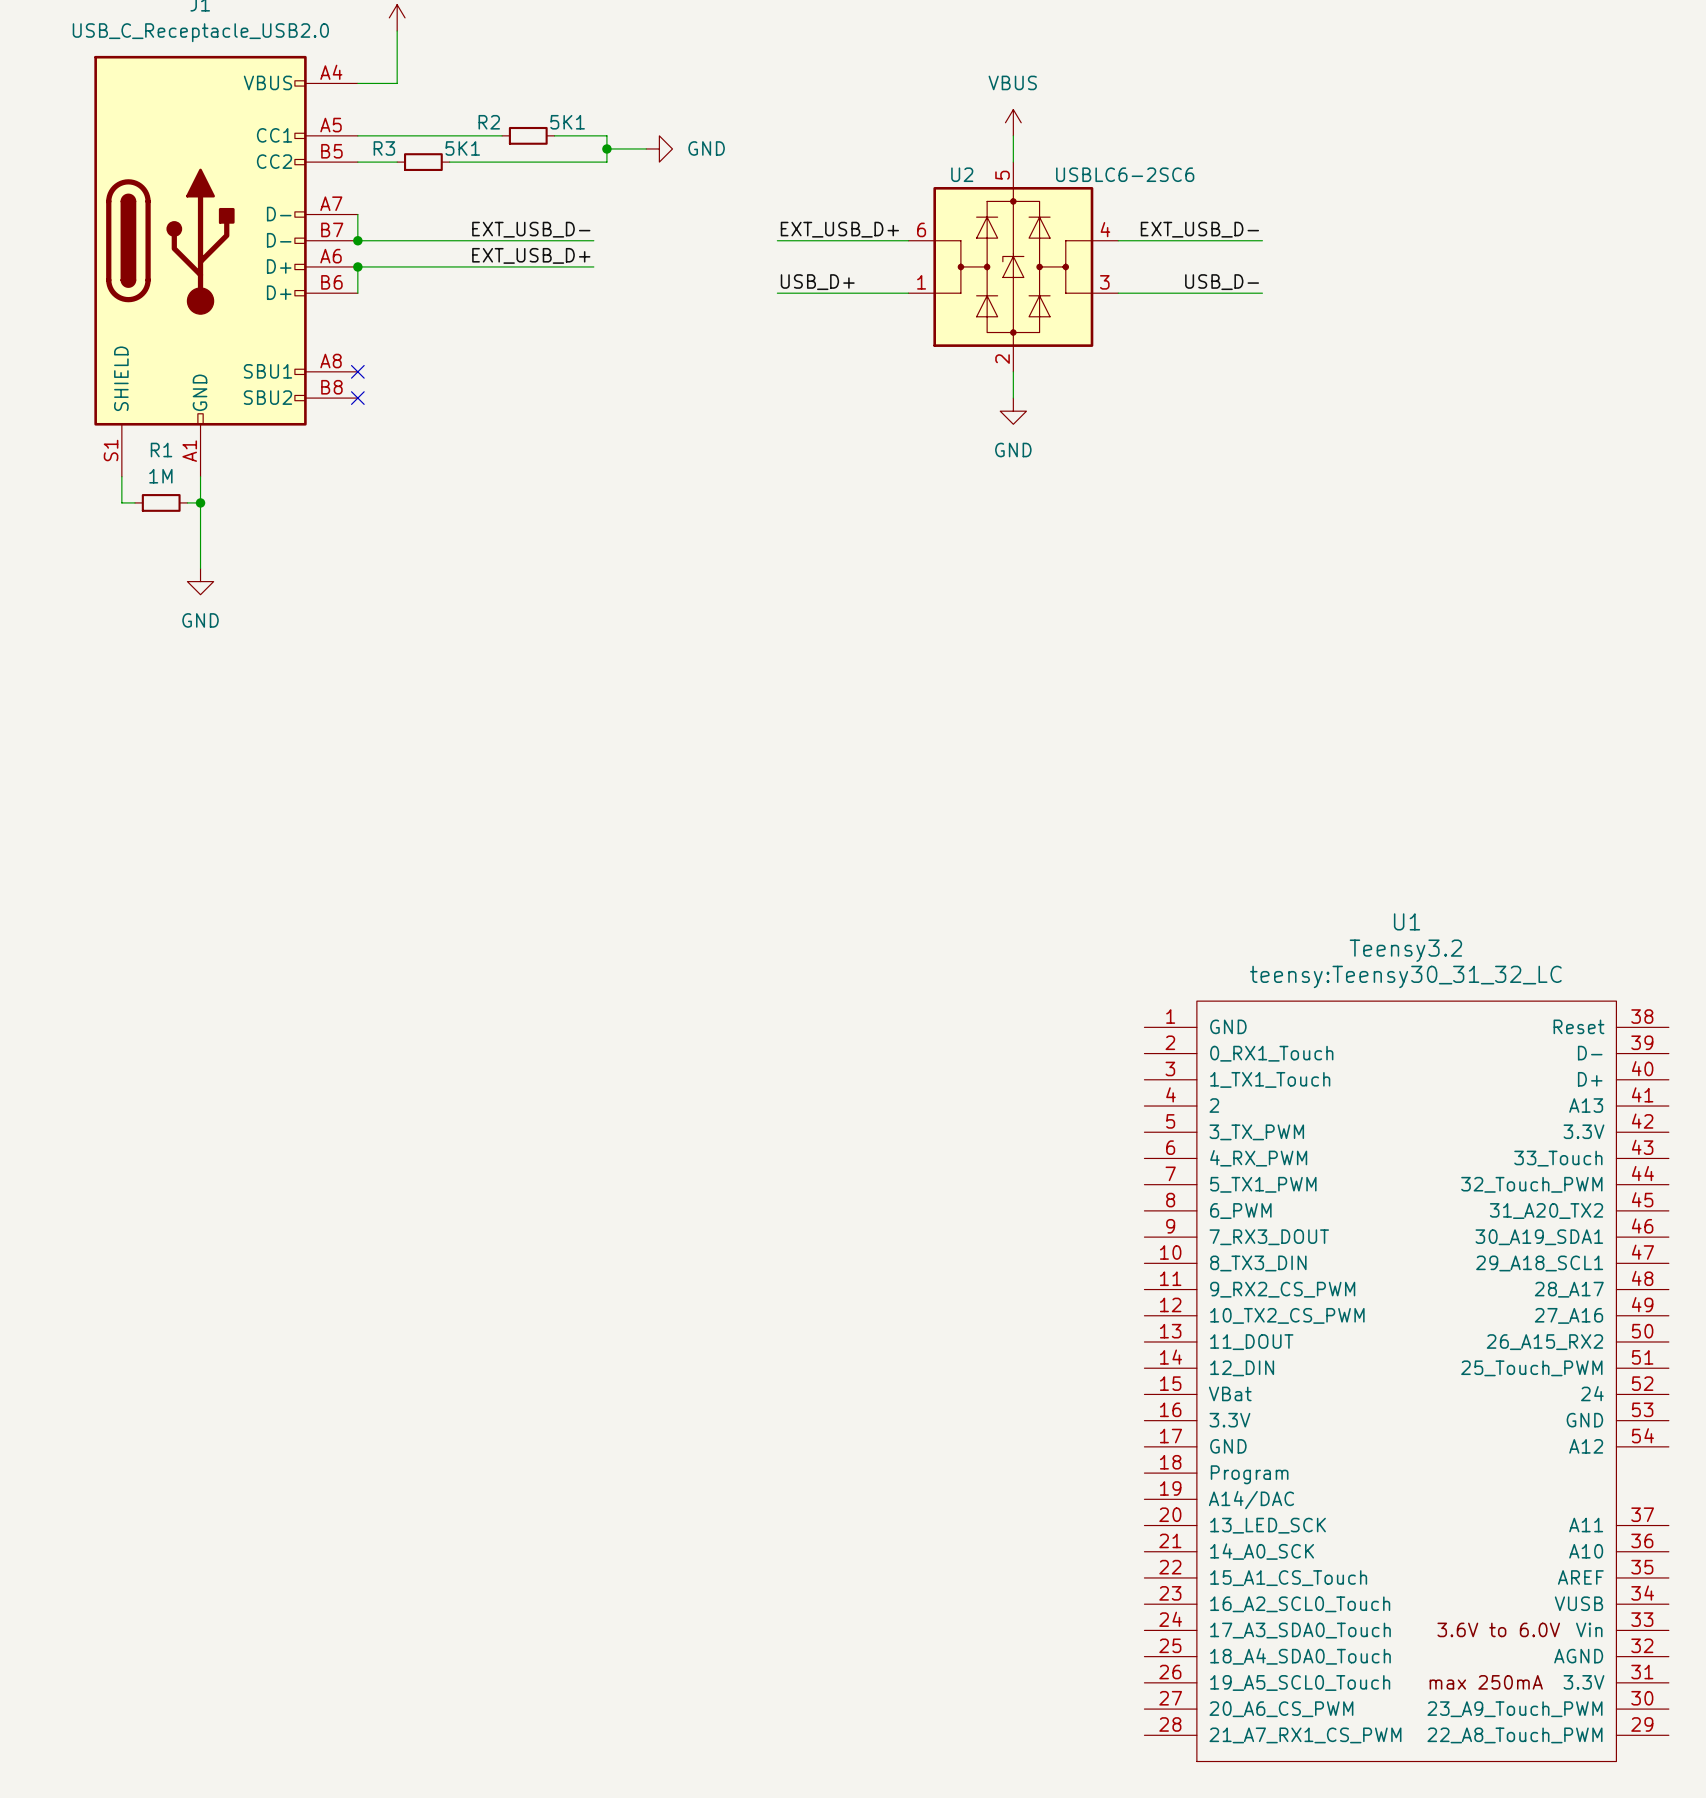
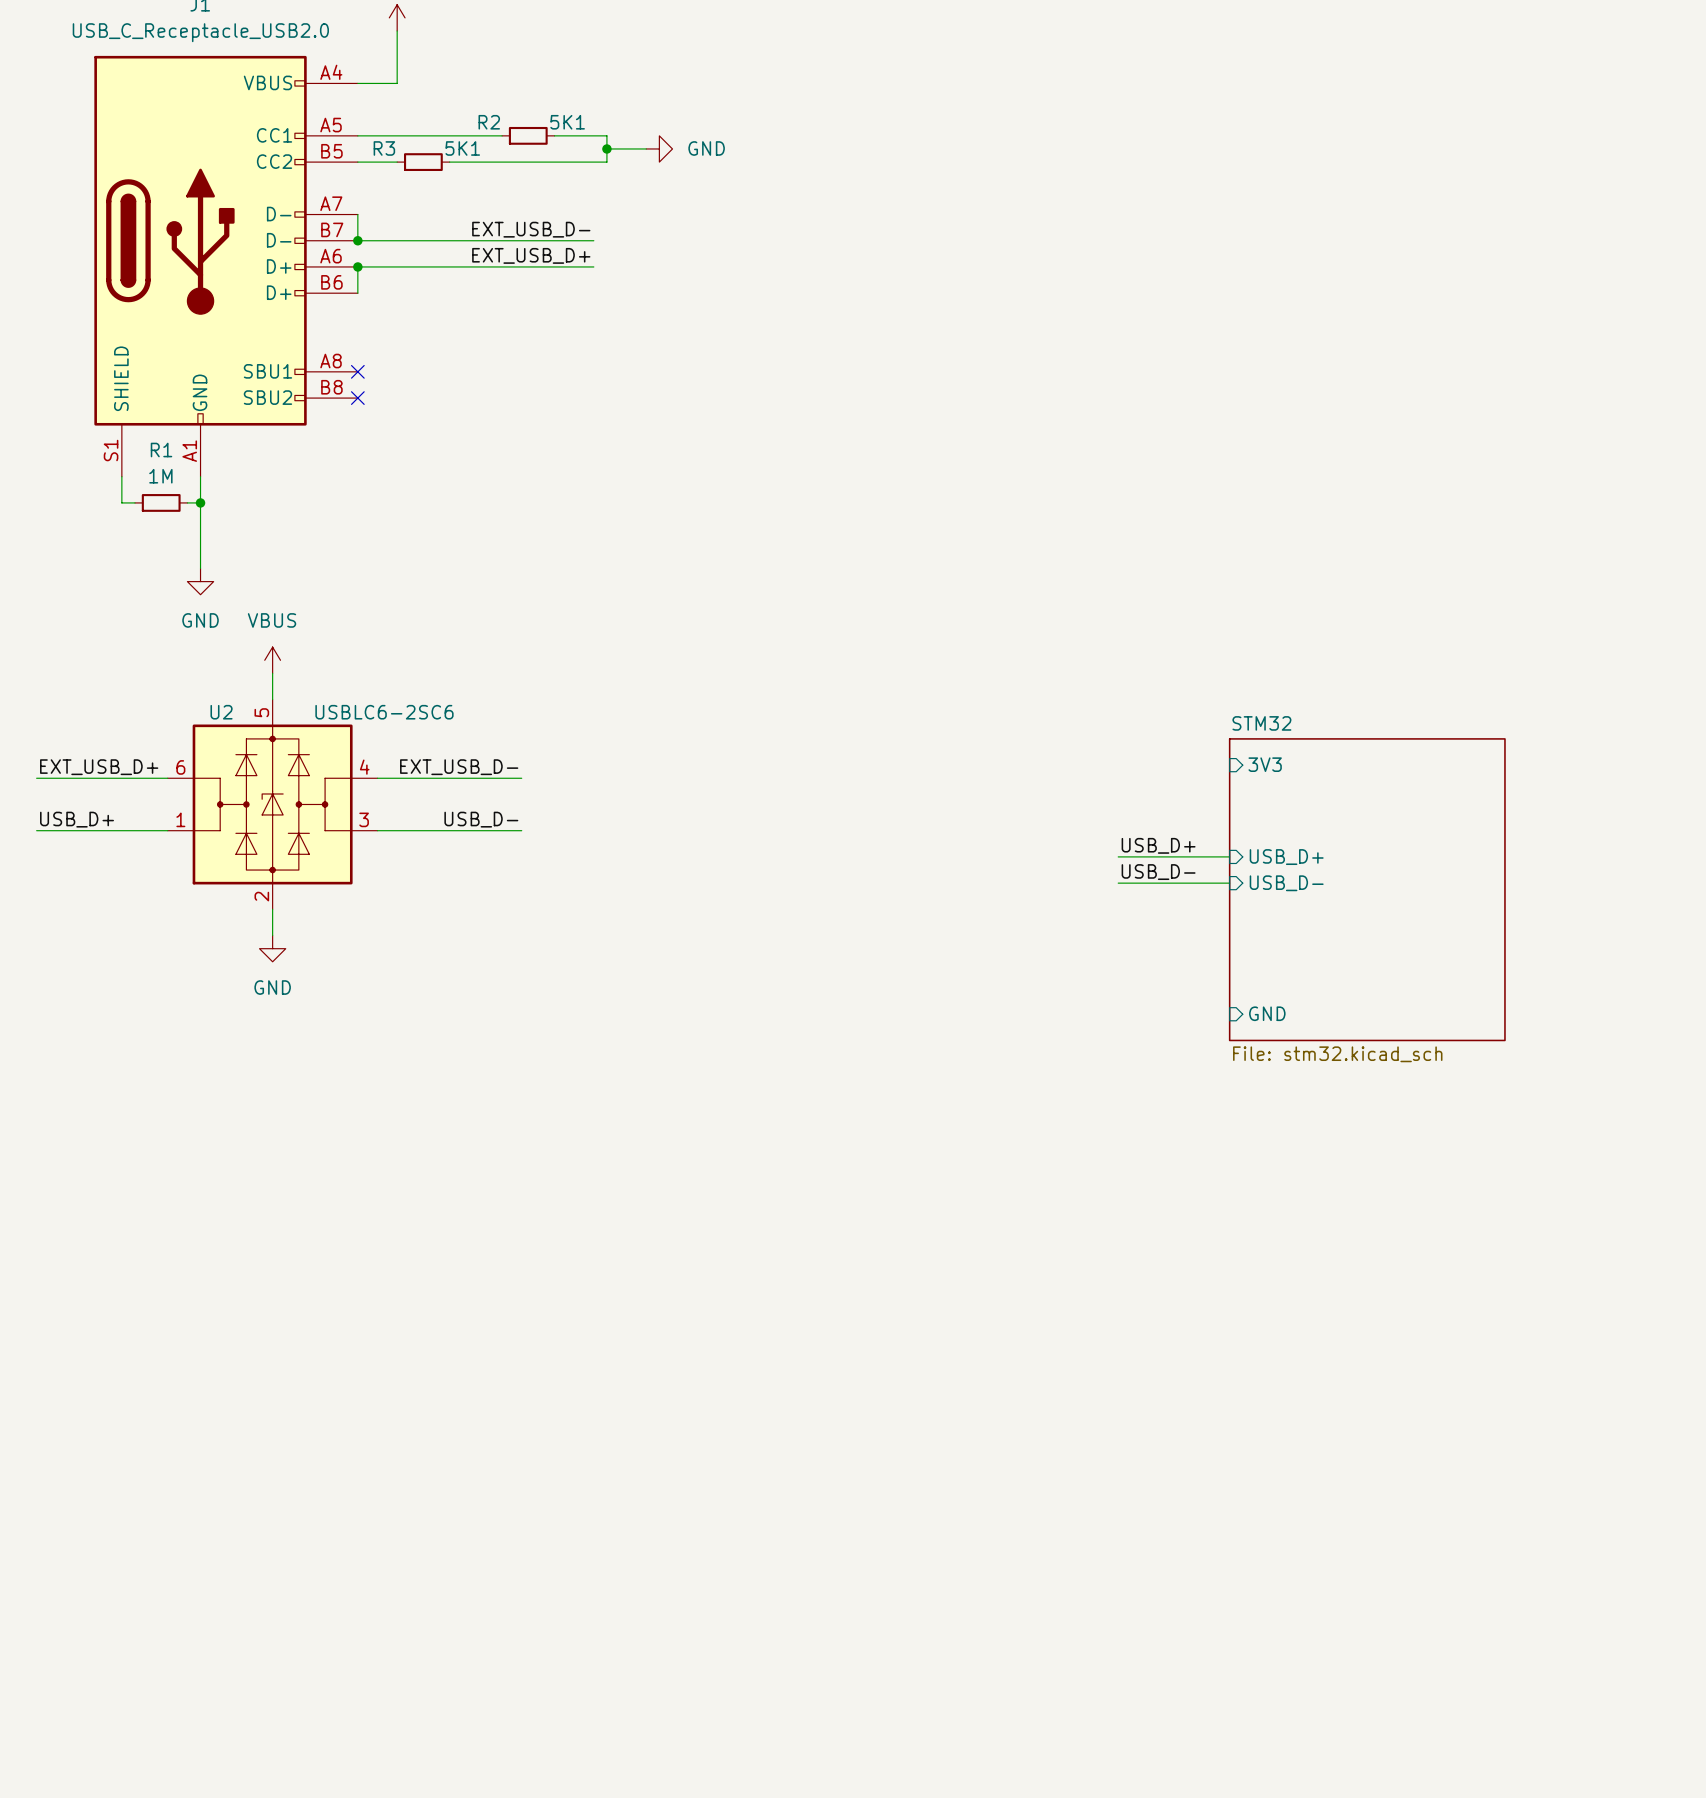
power symbol: VBUS (1013, 122) -> none
wire: (1013, 135) (1013, 162) -> none
label: EXT_USB_D+ (839, 229) -> none
label: EXT_USB_D- (1199, 229) -> none
wire: (777, 240) (908, 240) -> none
wire: (1118, 240) (1262, 240) -> none
U2 position: (1013, 266) -> (272, 804)
label: USB_D+ (817, 282) -> none
label: USB_D- (1222, 282) -> none
wire: (777, 293) (908, 293) -> none
wire: (1118, 293) (1262, 293) -> none
wire: (1013, 371) (1013, 398) -> none
power symbol: GND (1013, 411) -> none
power symbol: none -> VBUS (272, 660)
wire: none -> (272, 673) (272, 699)
sheet pin: none -> 3V3 (1265, 764)
label: none -> EXT_USB_D+ (99, 767)
label: none -> EXT_USB_D- (459, 767)
wire: none -> (36, 778) (167, 778)
wire: none -> (377, 778) (521, 778)
label: none -> USB_D+ (77, 819)
label: none -> USB_D- (481, 819)
wire: none -> (36, 830) (167, 830)
wire: none -> (377, 830) (521, 830)
label: none -> USB_D+ (1158, 845)
wire: none -> (1118, 856) (1229, 856)
sheet pin: none -> USB_D+ (1286, 857)
label: none -> USB_D- (1158, 872)
wire: none -> (1118, 883) (1229, 883)
sheet pin: none -> USB_D- (1286, 883)
sheet STM32: none -> File: stm32.kicad_sch (1367, 889)
wire: none -> (272, 909) (272, 935)
power symbol: none -> GND (272, 948)
sheet pin: none -> GND (1267, 1013)
U1: Teensy3.2 (1406, 1381) -> none

